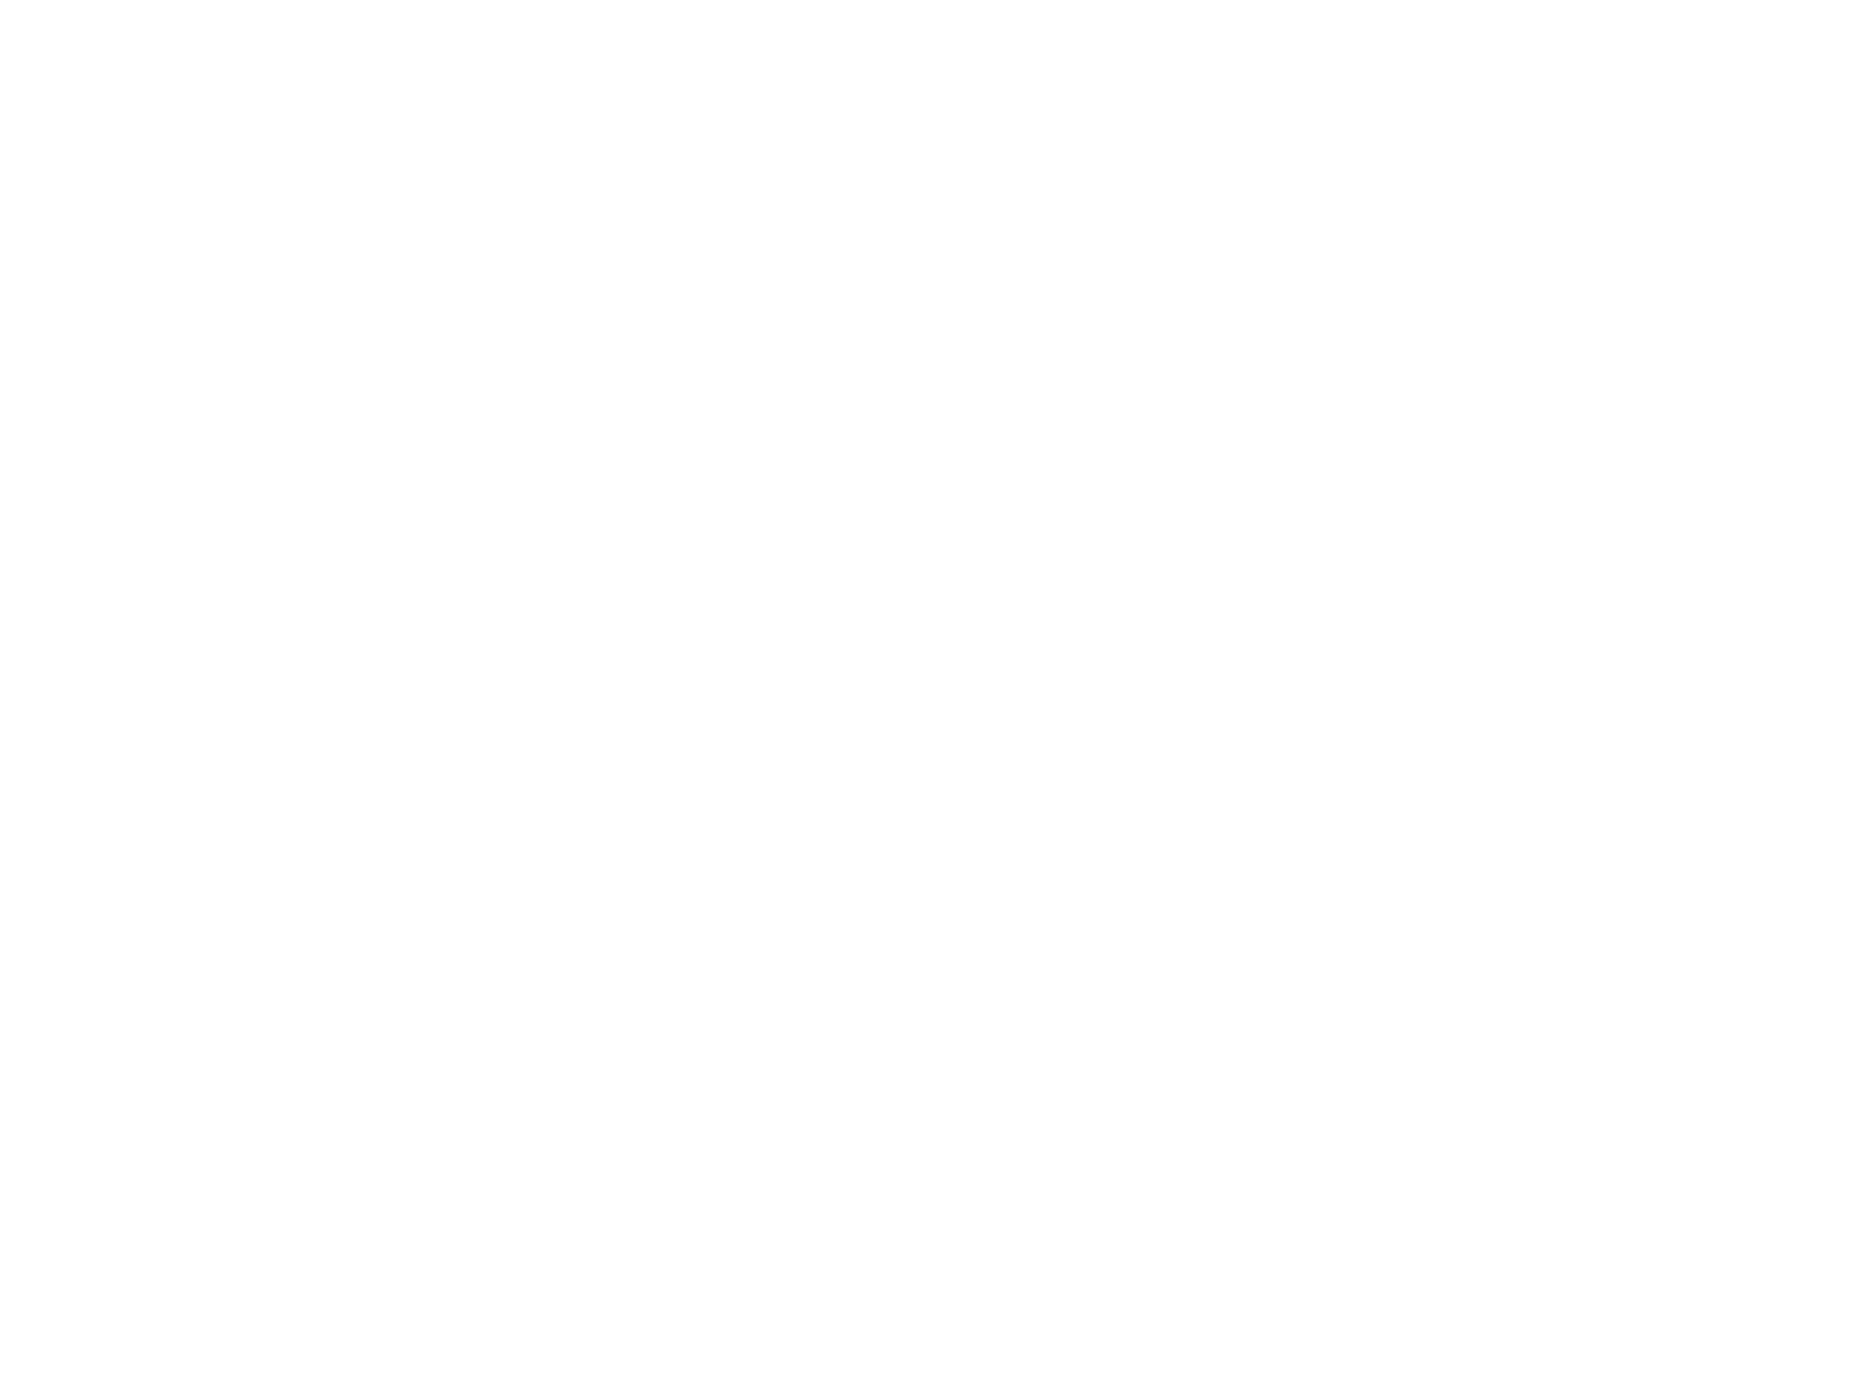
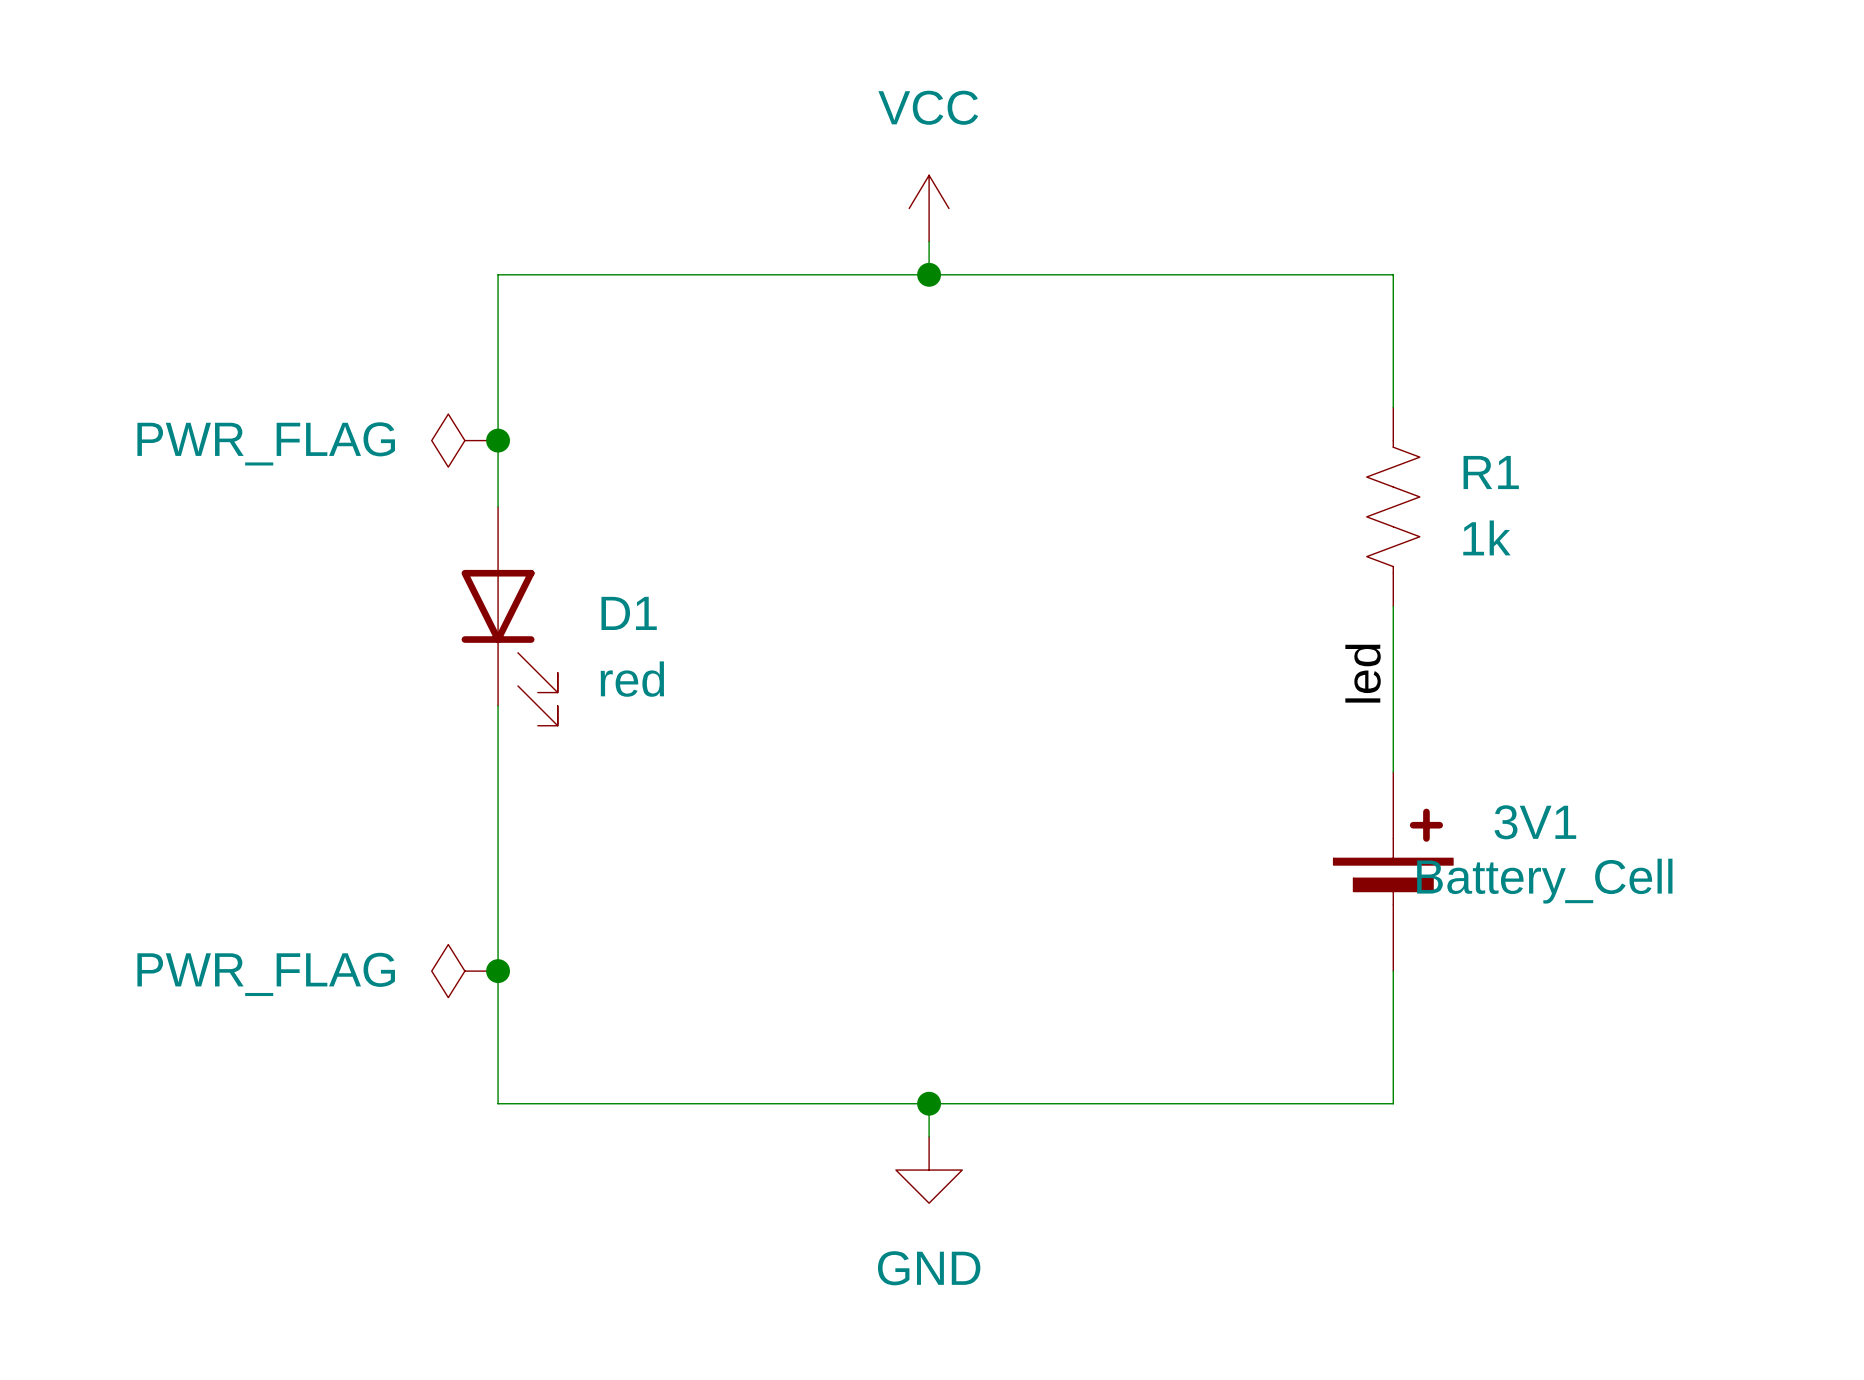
power symbol: none -> VCC (929, 208)
wire: none -> (929, 241) (929, 274)
junction: none -> (929, 274)
wire: none -> (1393, 407) (1393, 274) (498, 274) (498, 506)
power symbol: none -> PWR_FLAG (464, 440)
junction: none -> (498, 440)
R1: none -> 1k (1393, 506)
wire: none -> (1393, 606) (1393, 772)
D1: none -> red (509, 616)
label: none -> led (1363, 673)
wire: none -> (498, 705) (498, 1103) (1393, 1103) (1393, 971)
3V1: none -> Battery_Cell (1393, 871)
power symbol: none -> PWR_FLAG (464, 971)
junction: none -> (498, 971)
wire: none -> (929, 1103) (929, 1136)
junction: none -> (929, 1103)
power symbol: none -> GND (929, 1170)

